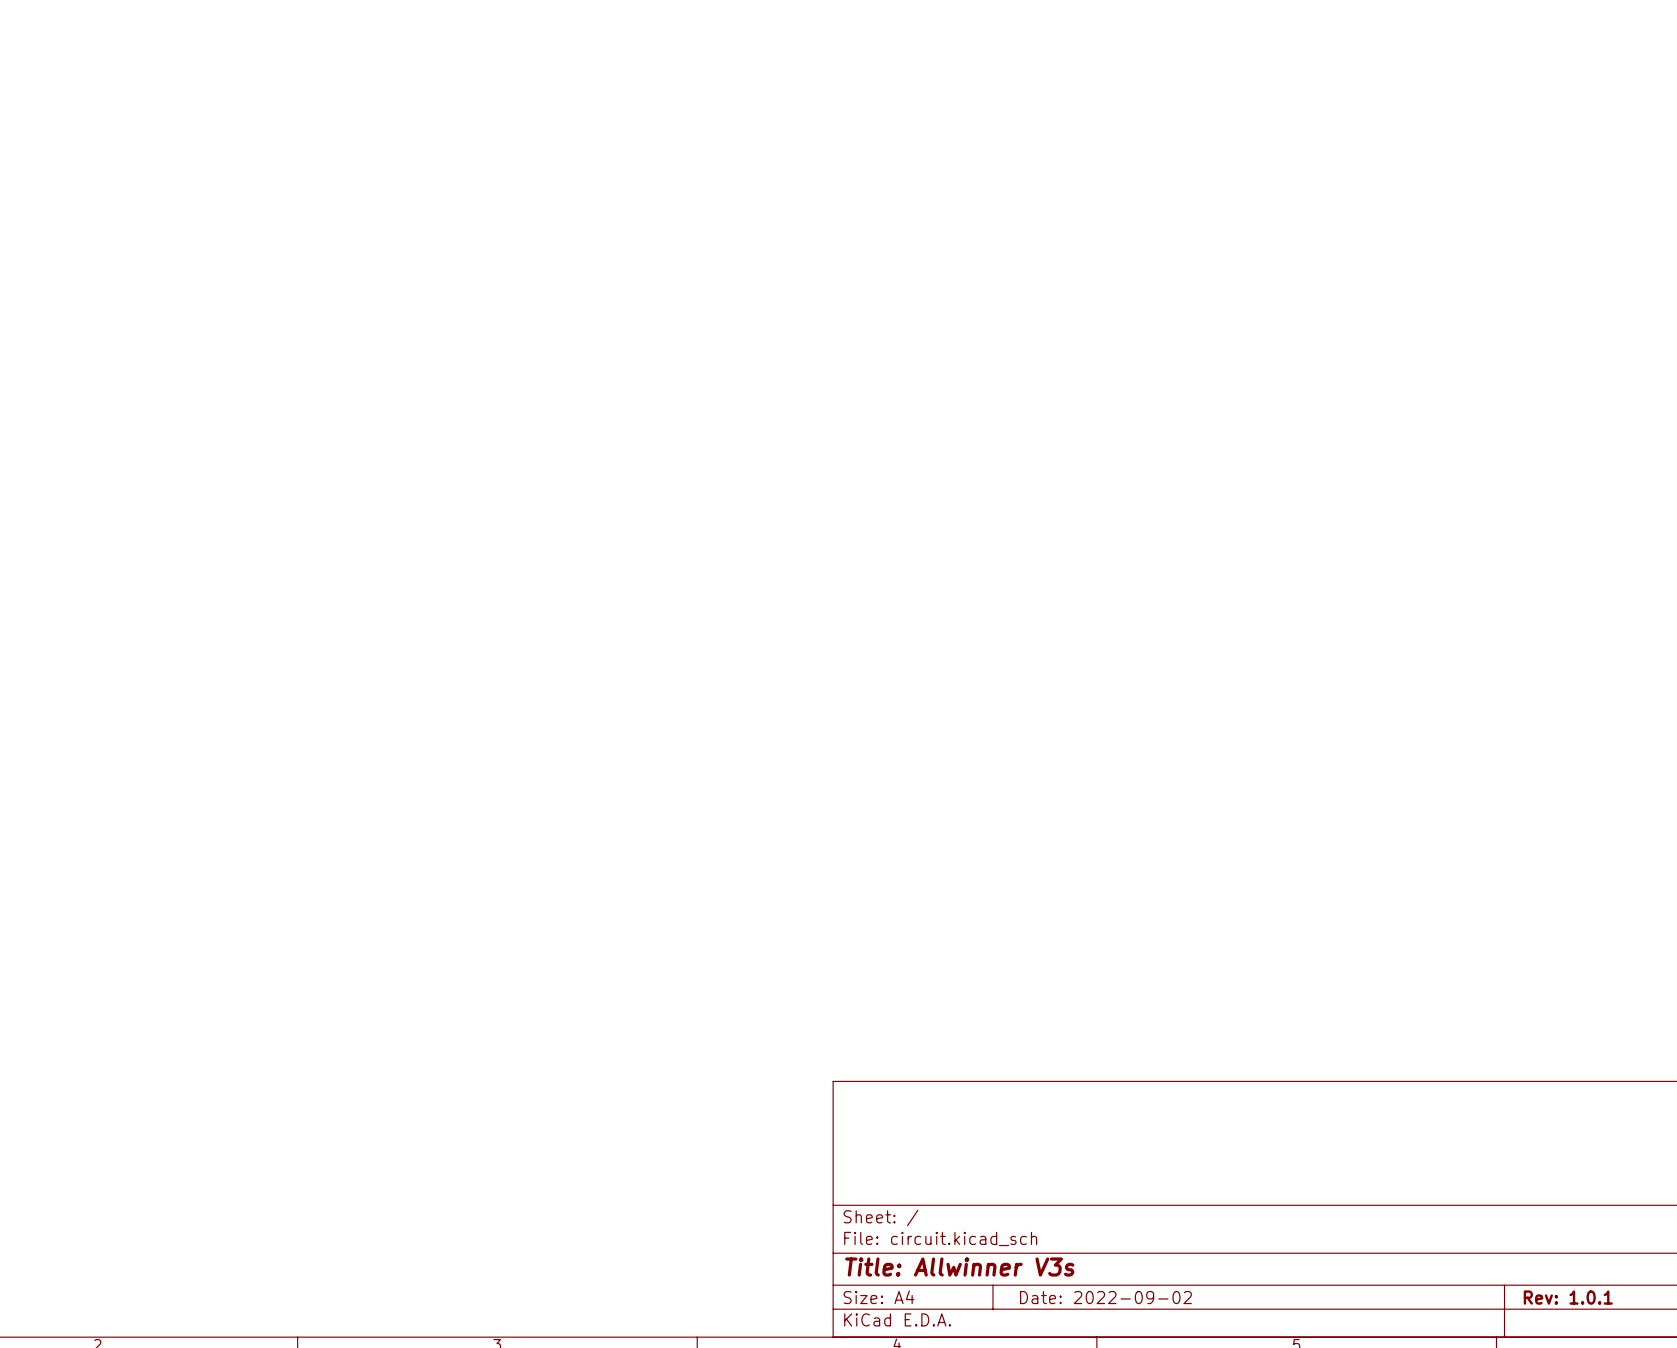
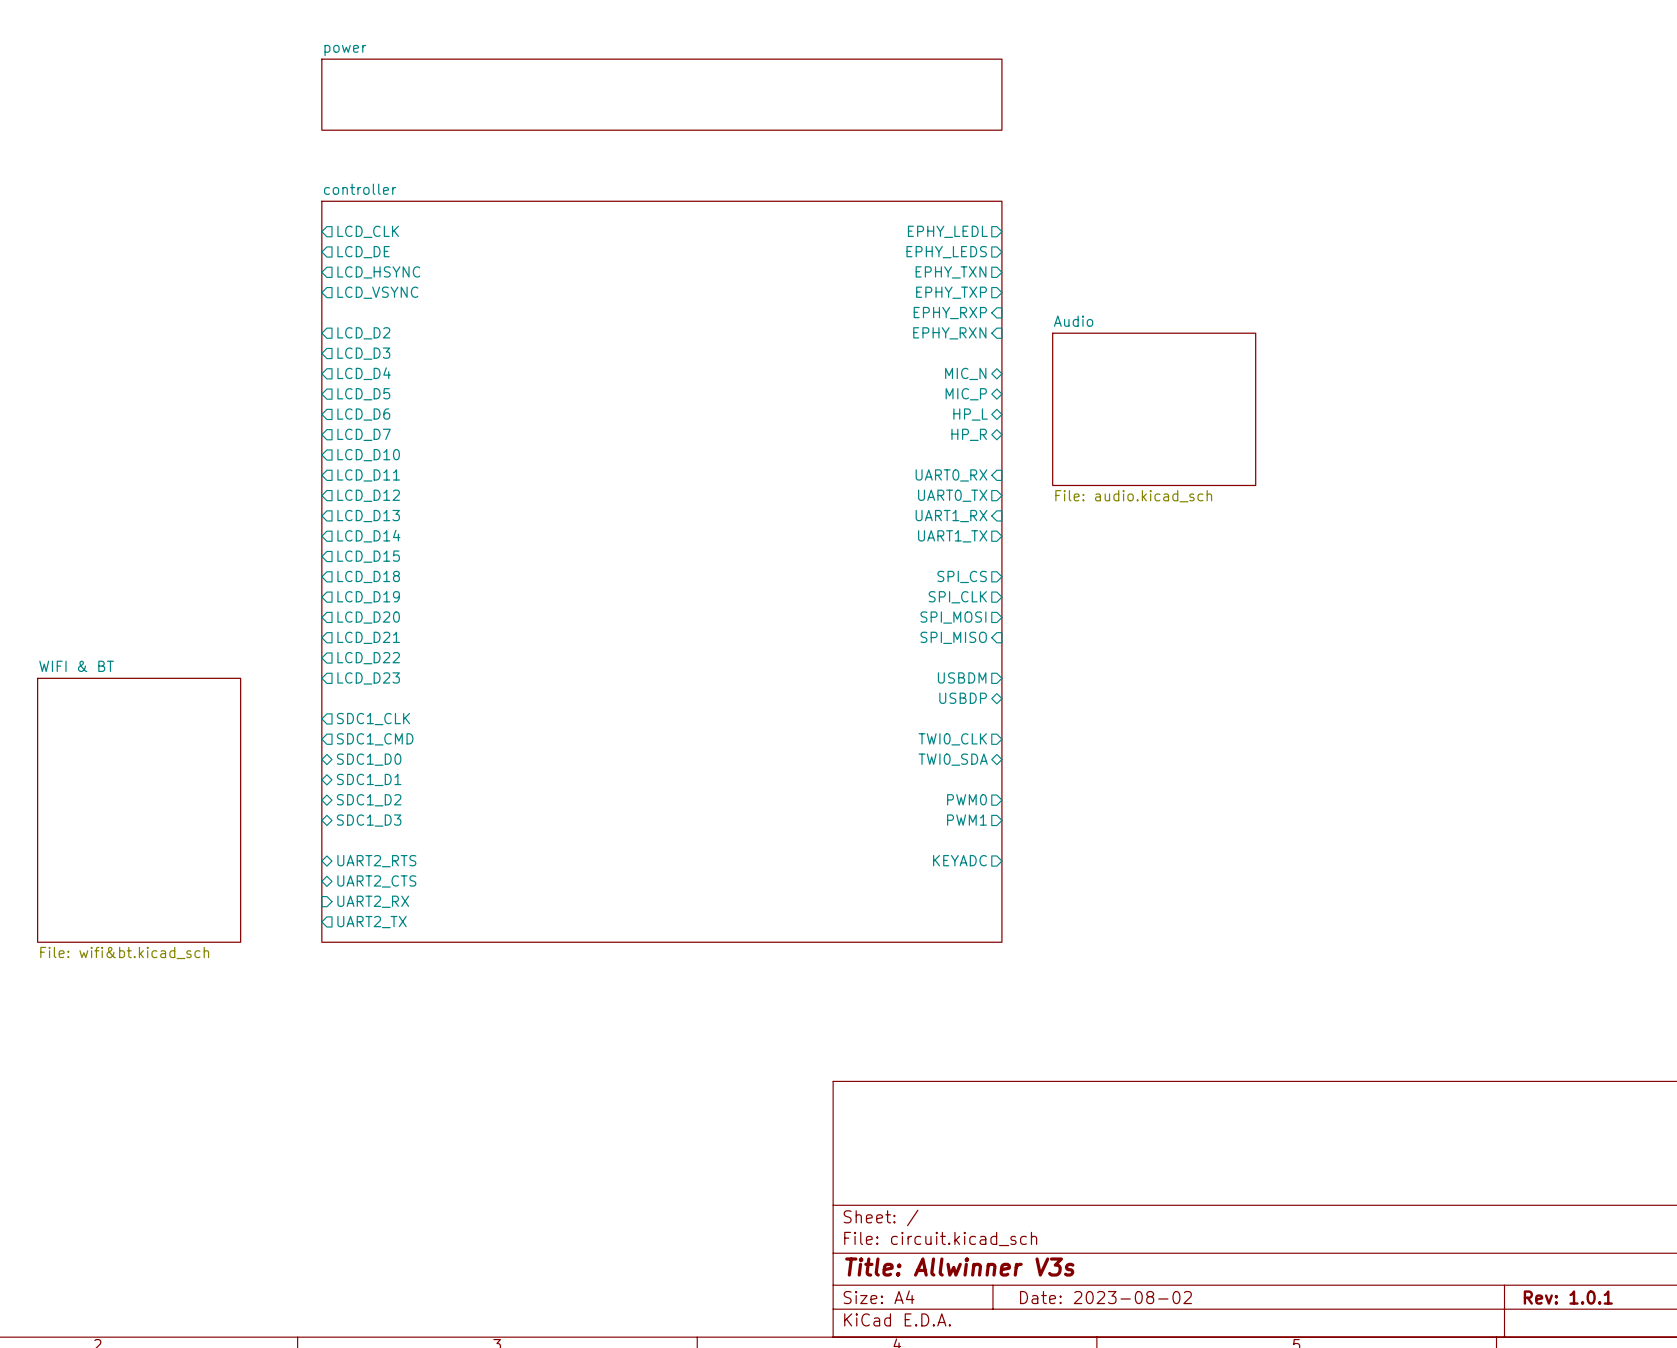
sheet power: none -> (661, 94)
sheet pin: none -> LCD_CLK (368, 231)
sheet pin: none -> EPHY_LEDL (947, 231)
sheet pin: none -> LCD_DE (363, 252)
sheet pin: none -> EPHY_LEDS (946, 252)
sheet pin: none -> LCD_HSYNC (378, 272)
sheet pin: none -> EPHY_TXN (951, 272)
sheet pin: none -> LCD_VSYNC (377, 292)
sheet pin: none -> EPHY_TXP (951, 292)
sheet pin: none -> EPHY_RXP (950, 313)
sheet pin: none -> LCD_D2 (363, 333)
sheet pin: none -> EPHY_RXN (949, 333)
sheet pin: none -> LCD_D3 (363, 353)
sheet pin: none -> LCD_D4 (364, 373)
sheet pin: none -> MIC_N (965, 373)
sheet pin: none -> LCD_D5 (363, 394)
sheet pin: none -> MIC_P (966, 394)
sheet Audio: none -> File: audio.kicad_sch (1154, 409)
sheet pin: none -> LCD_D6 (363, 414)
sheet pin: none -> HP_L (970, 414)
sheet pin: none -> LCD_D7 (364, 434)
sheet pin: none -> HP_R (969, 434)
sheet pin: none -> LCD_D10 (368, 455)
sheet pin: none -> LCD_D11 (368, 475)
sheet pin: none -> UART0_RX (951, 475)
sheet pin: none -> LCD_D12 (368, 495)
sheet pin: none -> UART0_TX (952, 495)
sheet pin: none -> LCD_D13 (368, 516)
sheet pin: none -> UART1_RX (951, 516)
sheet pin: none -> LCD_D14 (368, 536)
sheet pin: none -> UART1_TX (952, 536)
sheet pin: none -> LCD_D15 (368, 556)
sheet controller: none -> (661, 571)
sheet pin: none -> LCD_D18 (368, 576)
sheet pin: none -> SPI_CS (962, 576)
sheet pin: none -> LCD_D19 (368, 597)
sheet pin: none -> SPI_CLK (957, 597)
sheet pin: none -> LCD_D20 (368, 617)
sheet pin: none -> SPI_MOSI (953, 617)
sheet pin: none -> LCD_D21 (368, 637)
sheet pin: none -> SPI_MISO (953, 637)
sheet pin: none -> LCD_D22 (368, 658)
sheet pin: none -> USBDM (962, 677)
sheet pin: none -> LCD_D23 (368, 678)
sheet pin: none -> USBDP (963, 698)
sheet pin: none -> SDC1_CLK (373, 719)
sheet pin: none -> SDC1_CMD (375, 739)
sheet pin: none -> TWI0_CLK (952, 739)
sheet pin: none -> SDC1_D0 (369, 759)
sheet pin: none -> TWI0_SDA (953, 759)
sheet pin: none -> SDC1_D1 (369, 779)
sheet pin: none -> PWM0 (966, 799)
sheet pin: none -> SDC1_D2 (369, 800)
sheet WIFI & BT: none -> File: wifi&bt.kicad_sch (139, 810)
sheet pin: none -> SDC1_D3 (369, 820)
sheet pin: none -> PWM1 (966, 820)
sheet pin: none -> KEYADC (959, 860)
sheet pin: none -> UART2_RTS (376, 861)
sheet pin: none -> UART2_CTS (376, 881)
sheet pin: none -> UART2_RX (373, 901)
sheet pin: none -> UART2_TX (372, 922)
title block: Date: 2022-09-02 (1105, 1297) -> Date: 2023-08-02 (1105, 1297)

